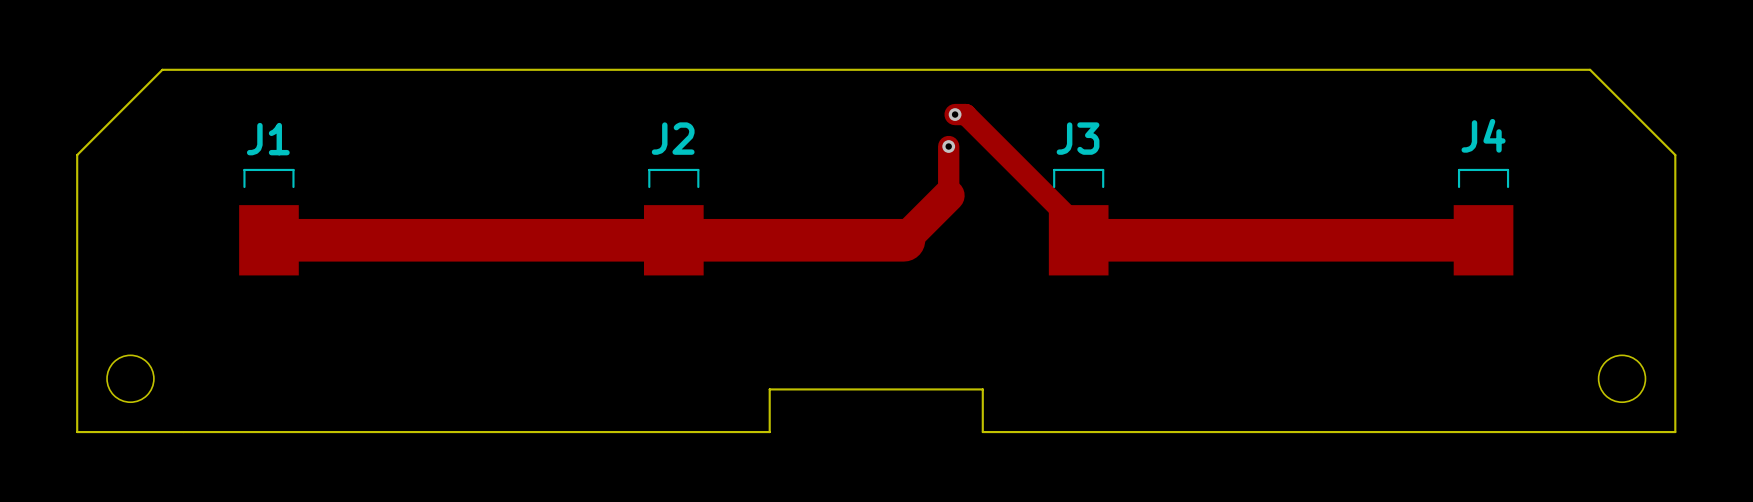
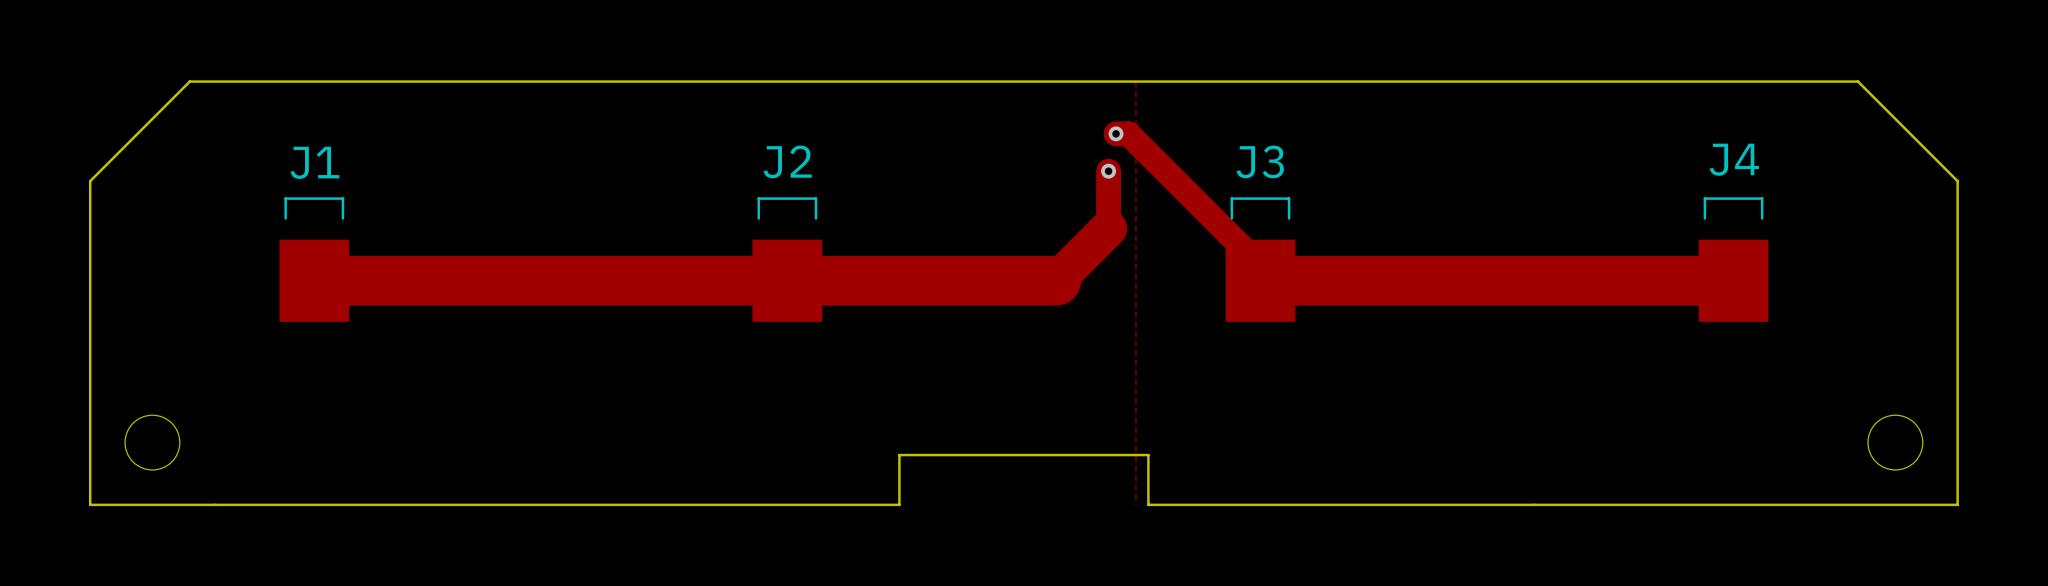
zone outline: none -> (1135, 81) (1135, 504)

